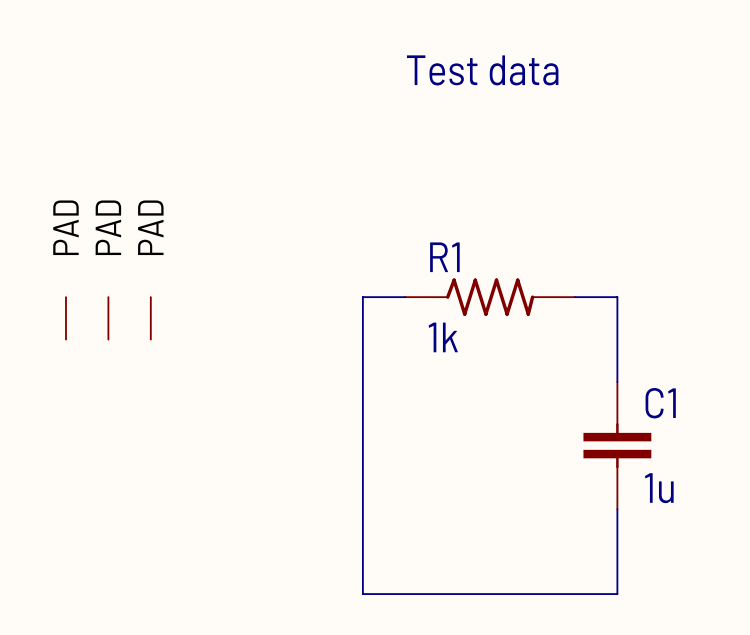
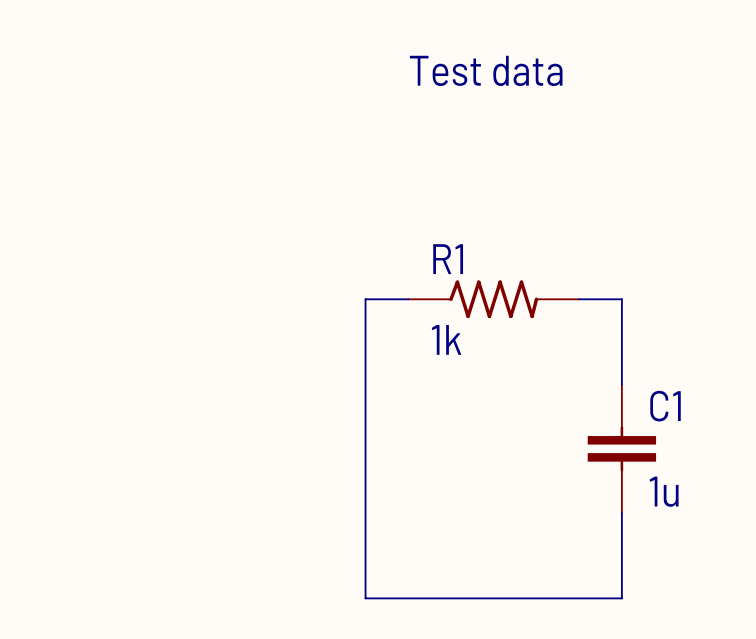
part: (65, 318) -> none
part: (108, 318) -> none
part: (150, 318) -> none

